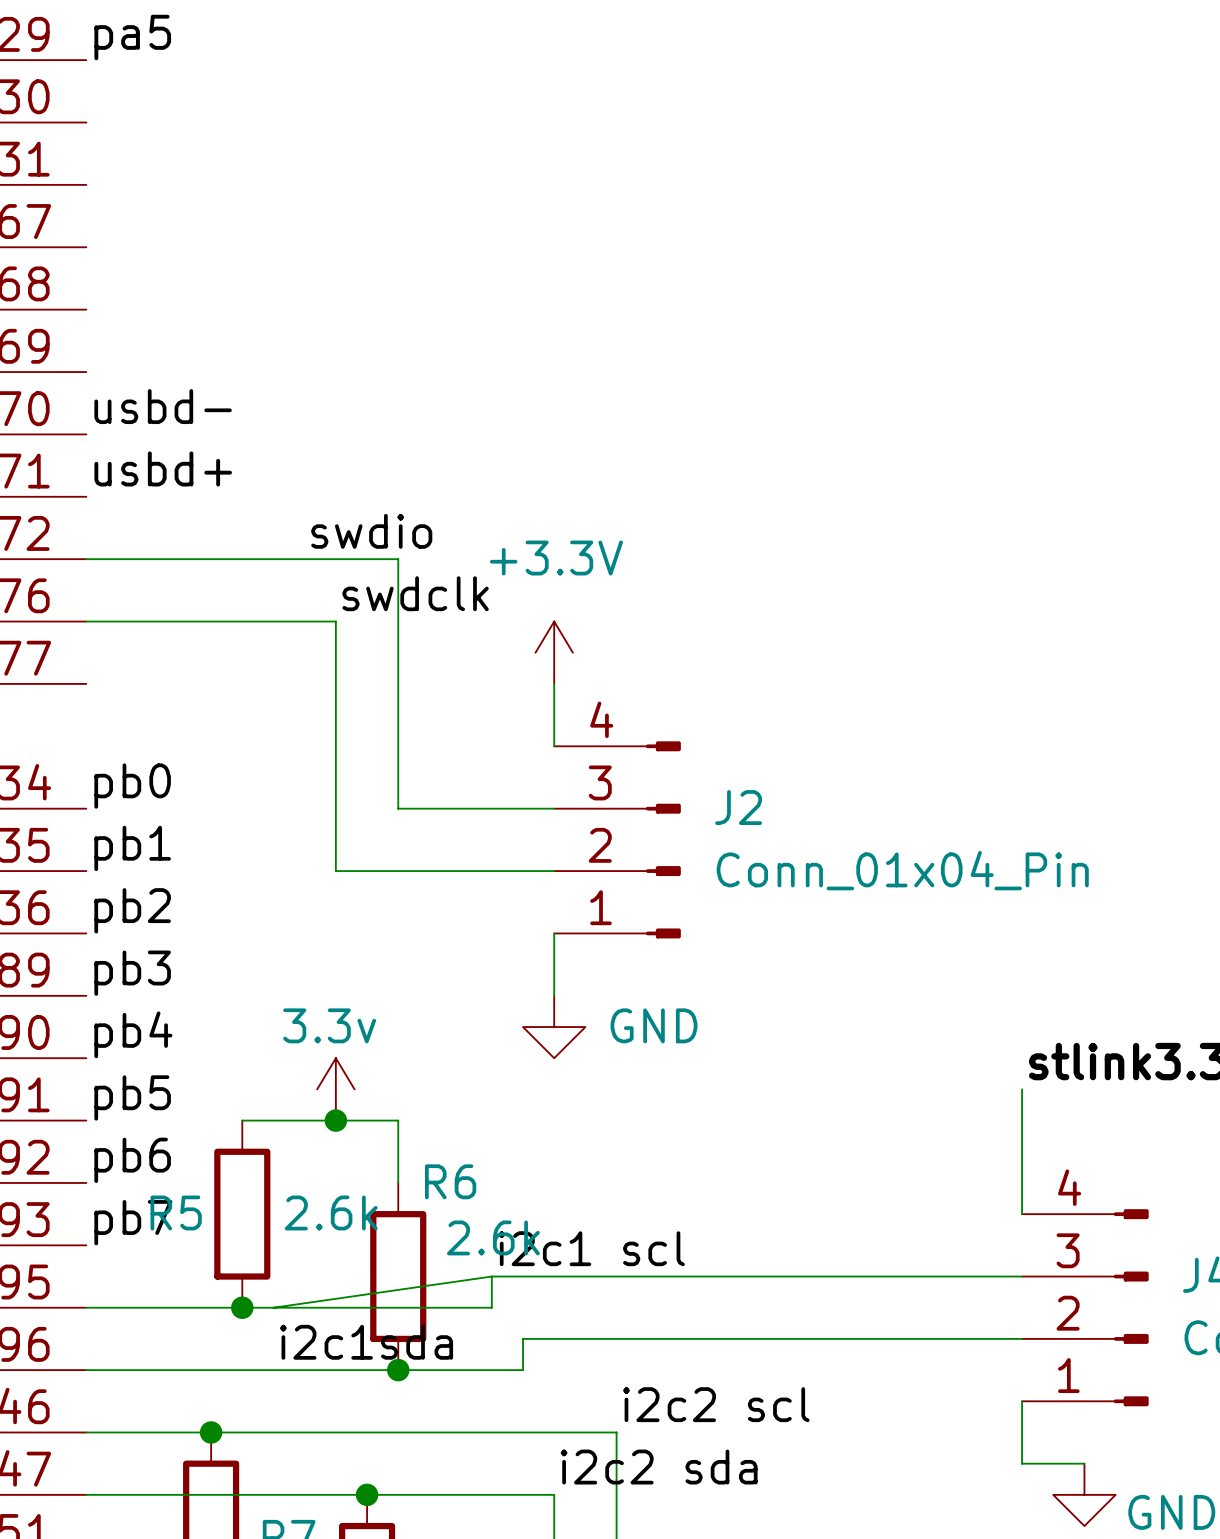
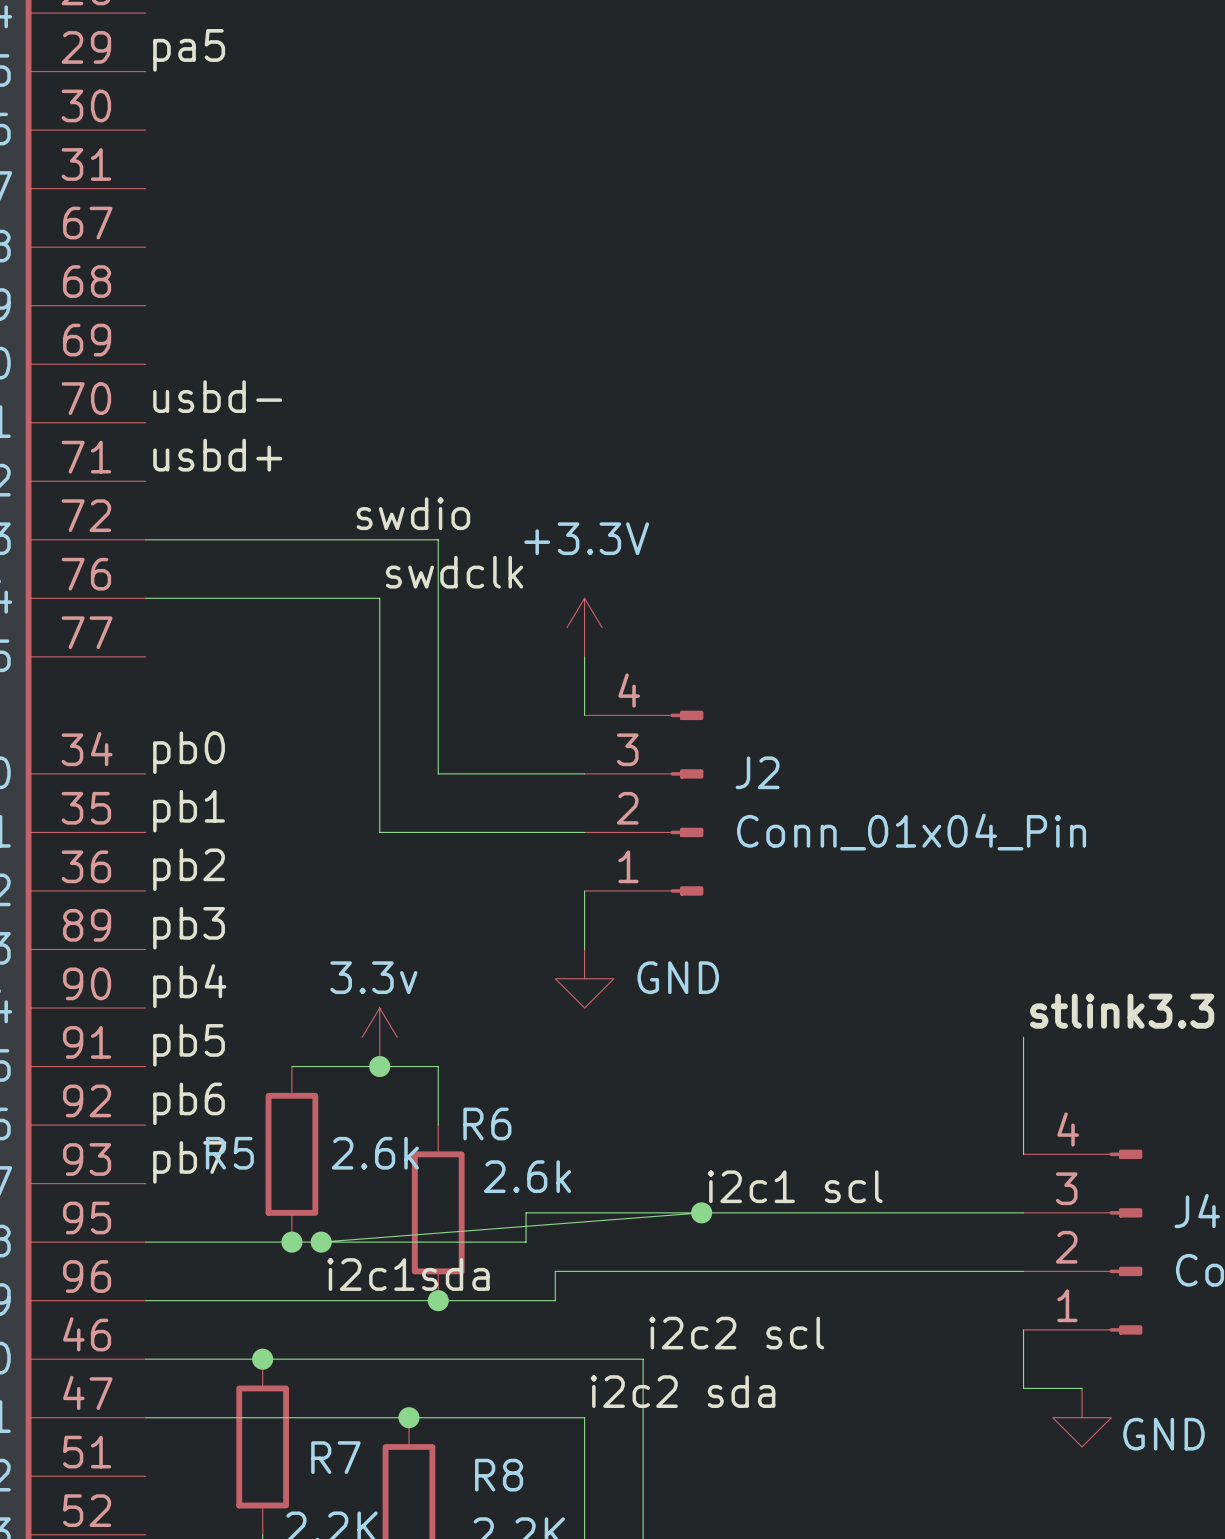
label position: i2c1 scl (591, 1248) -> i2c1 scl (795, 1186)
wire: (491, 1276) (273, 1307) -> (701, 1212) (321, 1242)
junction: none -> (701, 1212)
junction: none -> (321, 1242)

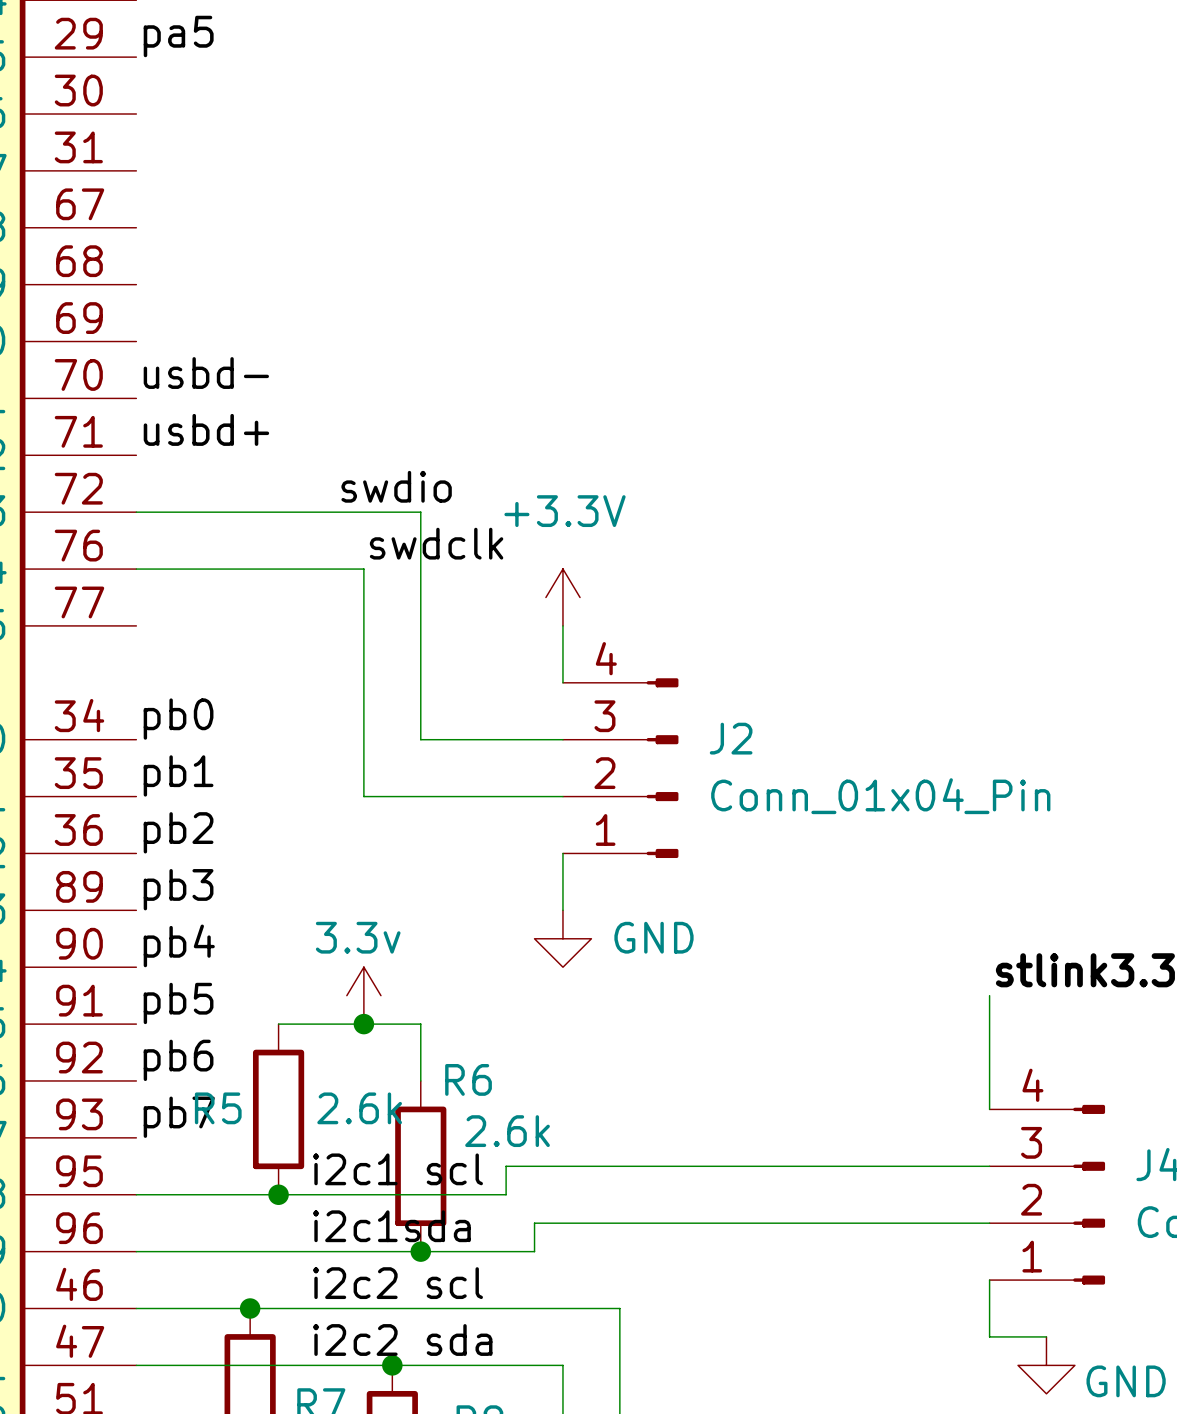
label position: i2c1 scl (795, 1186) -> i2c1 scl (397, 1169)
wire: (701, 1212) (321, 1242) -> none
junction: (701, 1212) -> none
junction: (321, 1242) -> none
label position: i2c2 scl (736, 1333) -> i2c2 scl (397, 1283)
label position: i2c2 sda (683, 1391) -> i2c2 sda (402, 1340)

